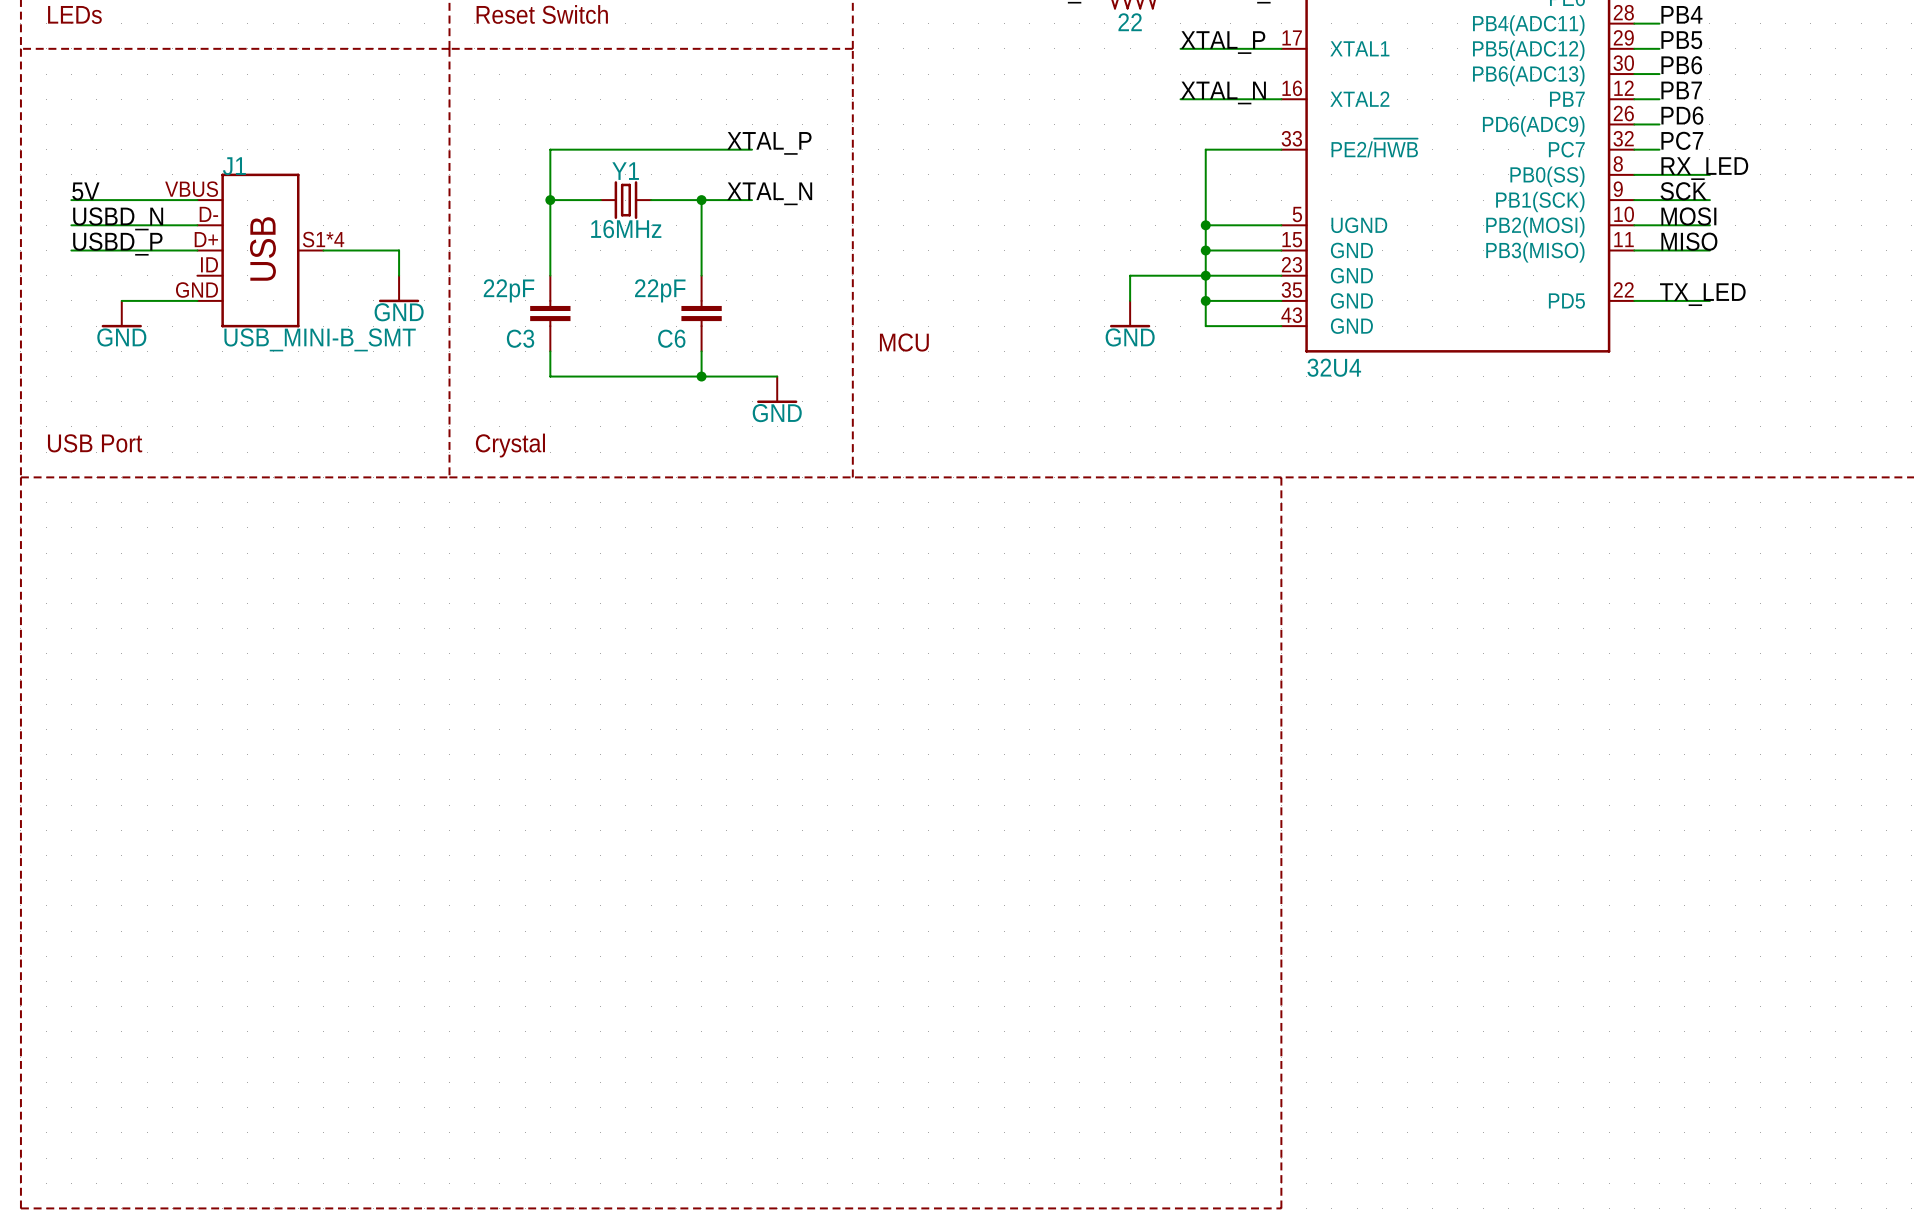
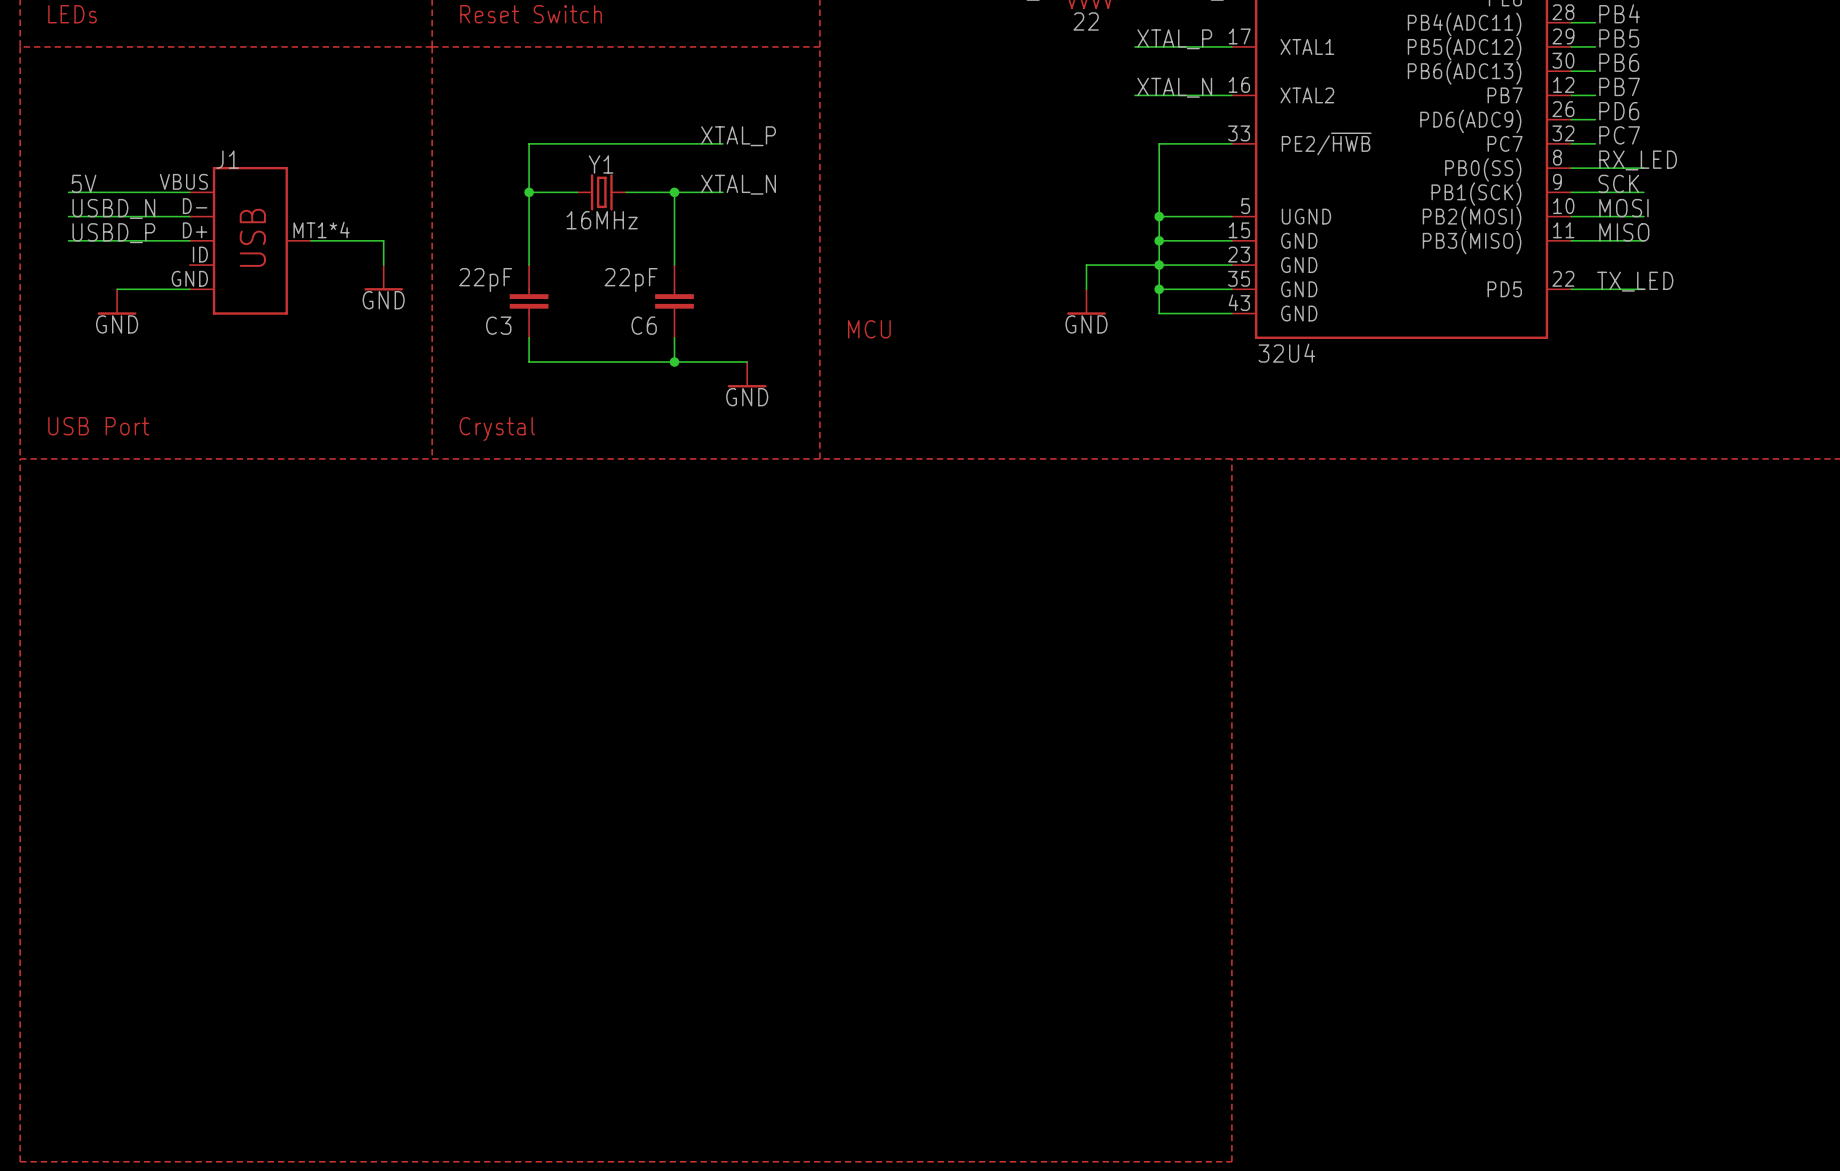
J1 pin number: S1*4 (323, 239) -> MT1*4 (321, 229)
J1 value: USB_MINI-B_SMT (320, 339) -> none

